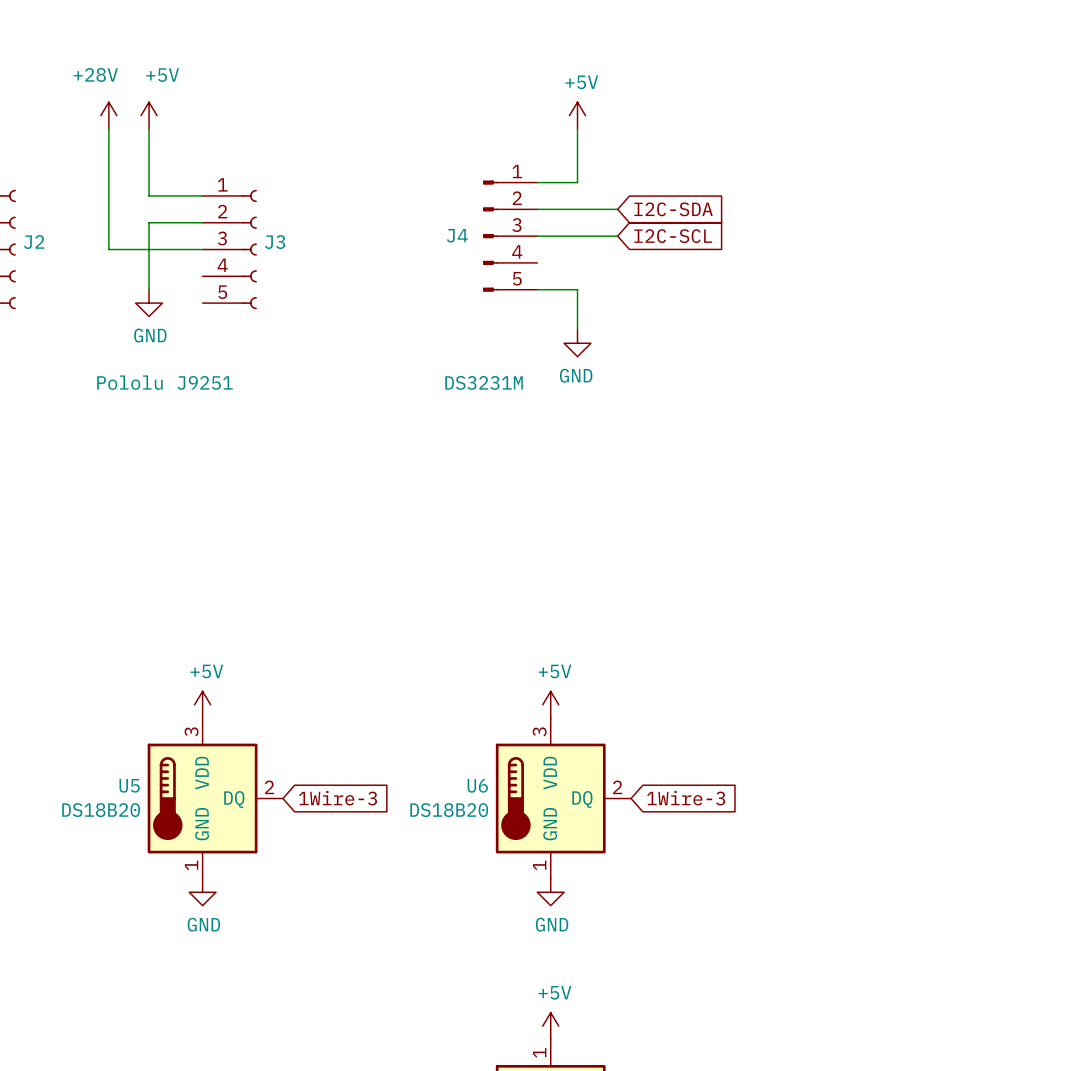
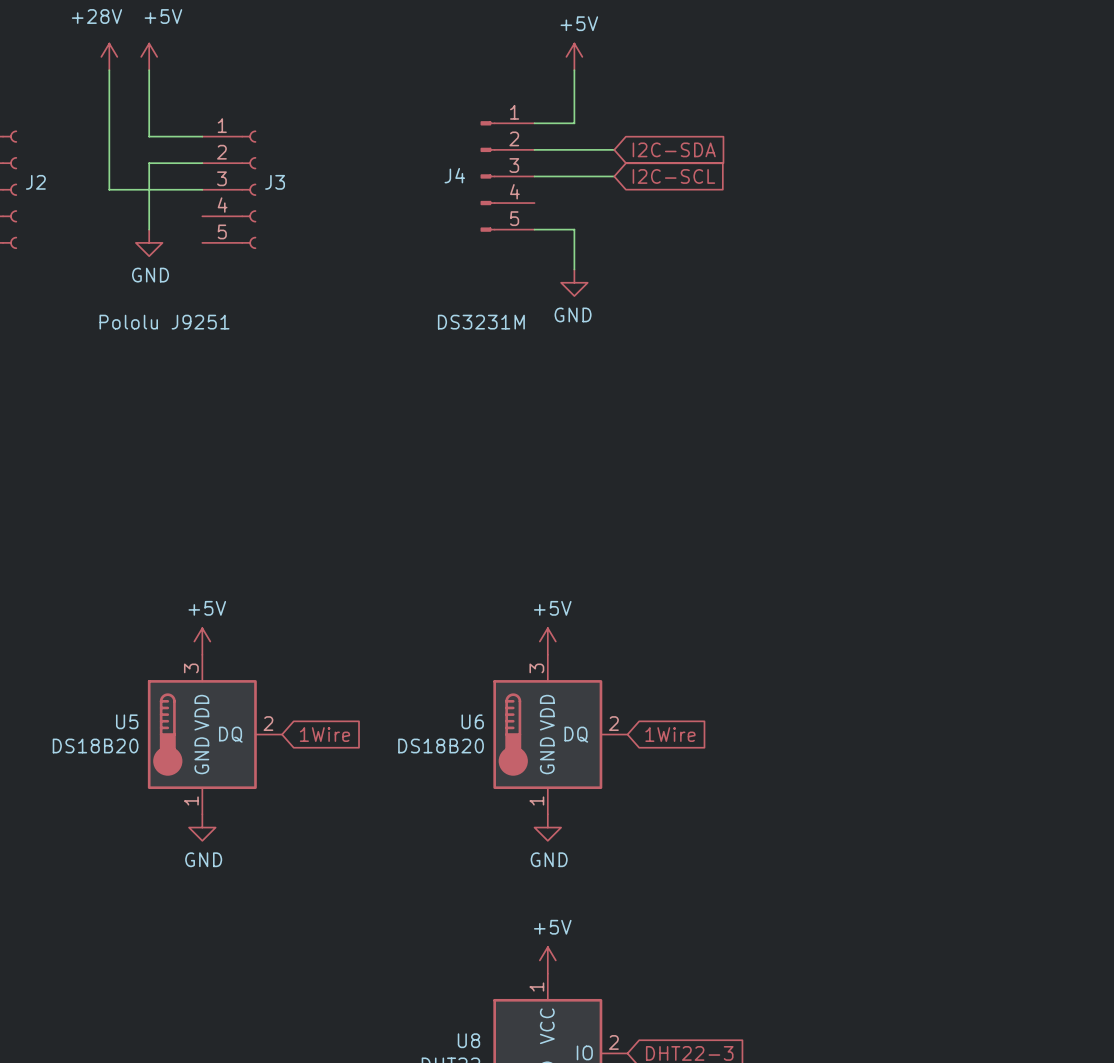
global label: 1Wire-3 (338, 798) -> 1Wire (324, 734)
global label: 1Wire-3 (686, 798) -> 1Wire (670, 734)

